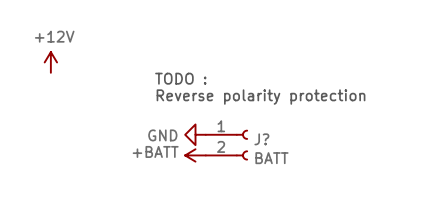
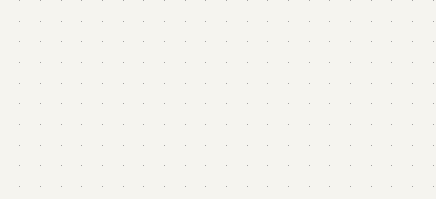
power symbol: +12V (50, 62) -> none
text: TODO : (180, 78) -> none
text: Reverse polarity protection (261, 97) -> none
power symbol: GND (195, 134) -> none
J?: BATT (226, 145) -> none
power symbol: +BATT (195, 155) -> none

